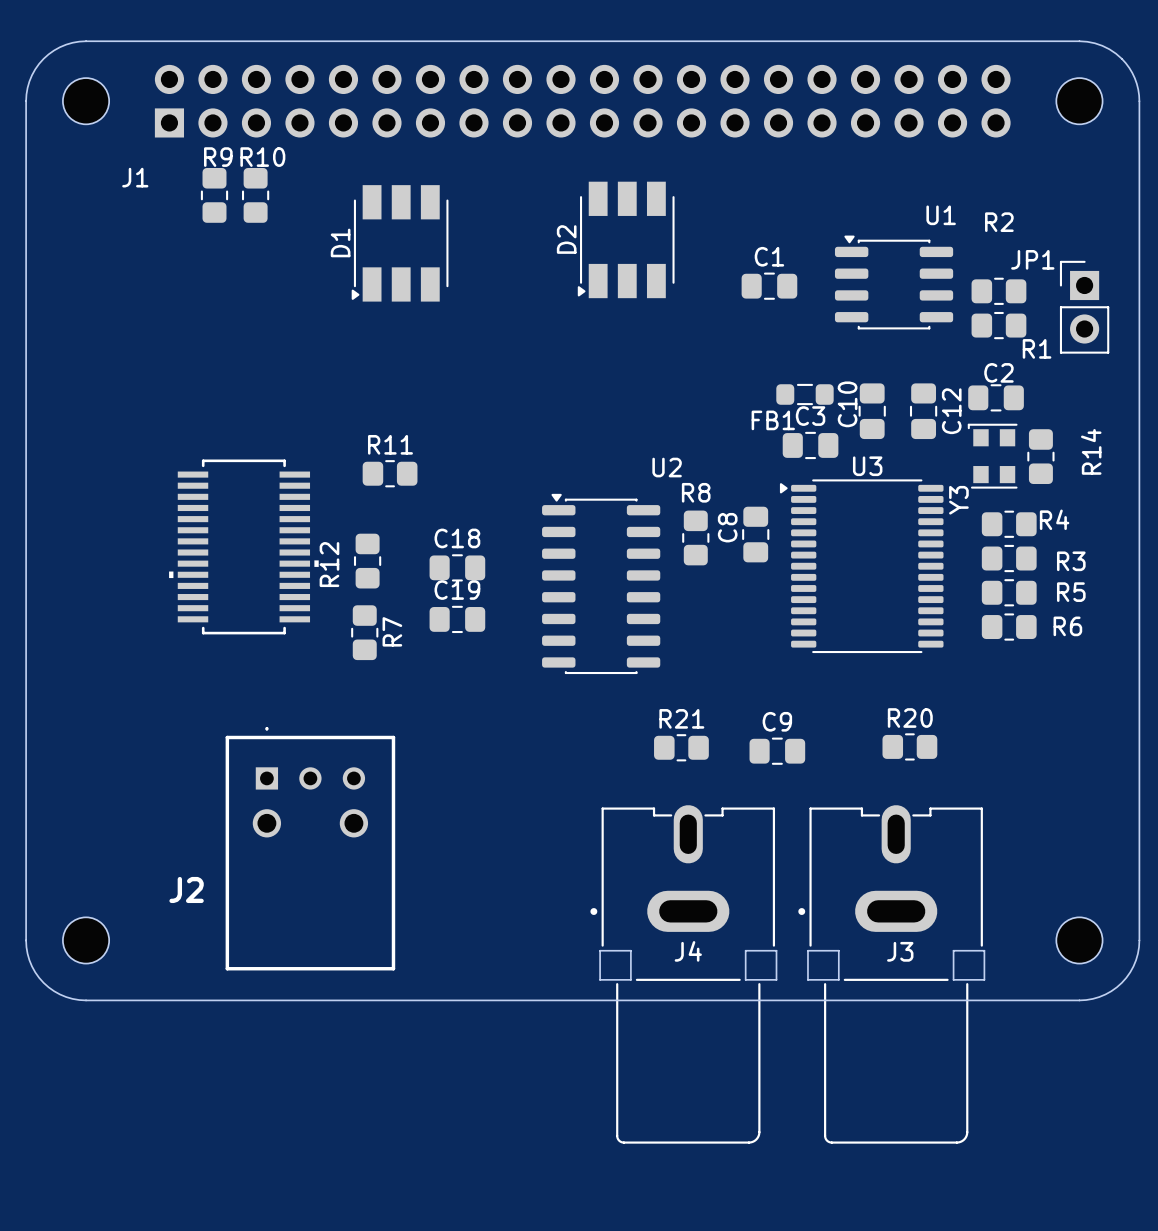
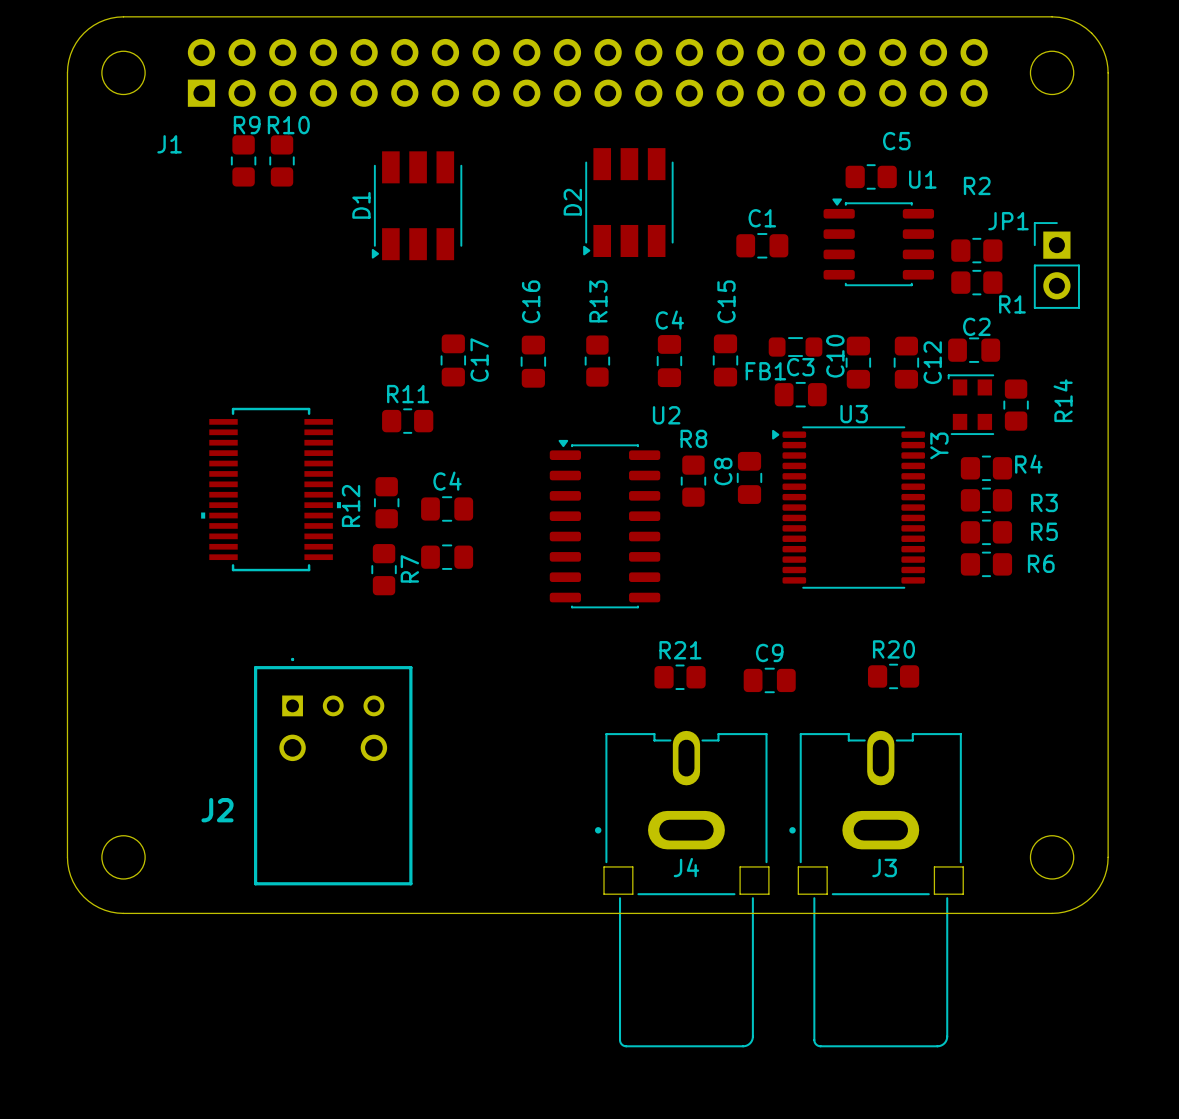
C5: none -> (871, 176)
C17: none -> (453, 360)
C15: none -> (725, 360)
R13: none -> (597, 361)
C4: none -> (669, 361)
C16: none -> (533, 361)
C4: none -> (447, 508)
C18: (457, 567) -> none
part: none -> (447, 557)
C19: (457, 619) -> none

